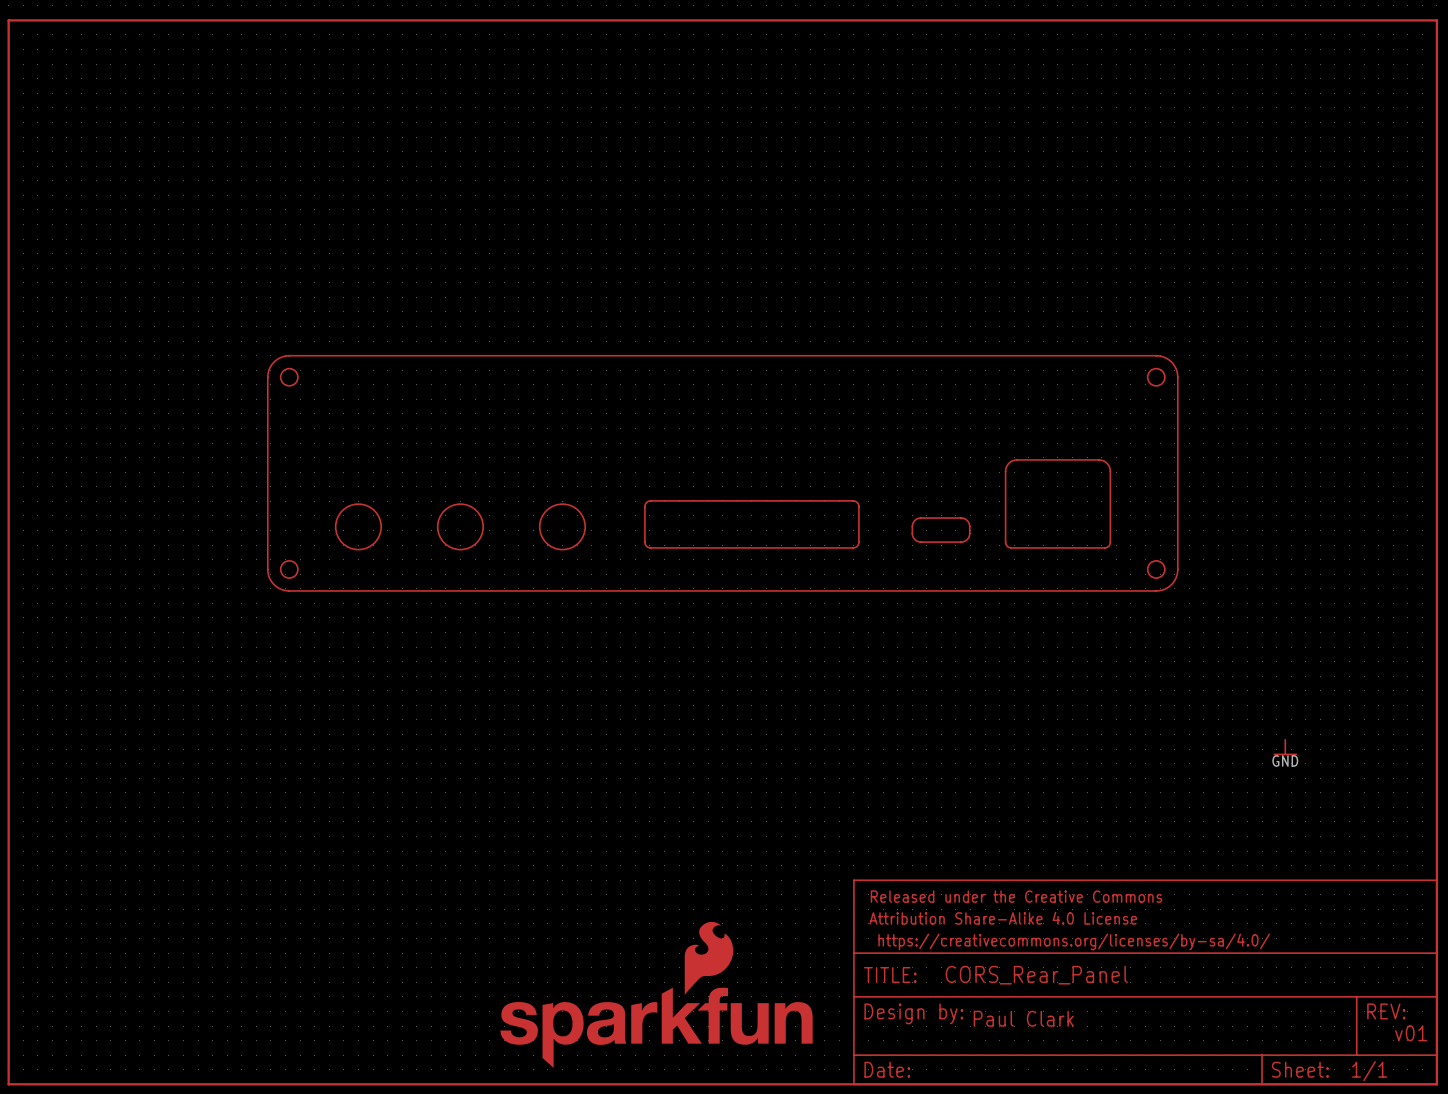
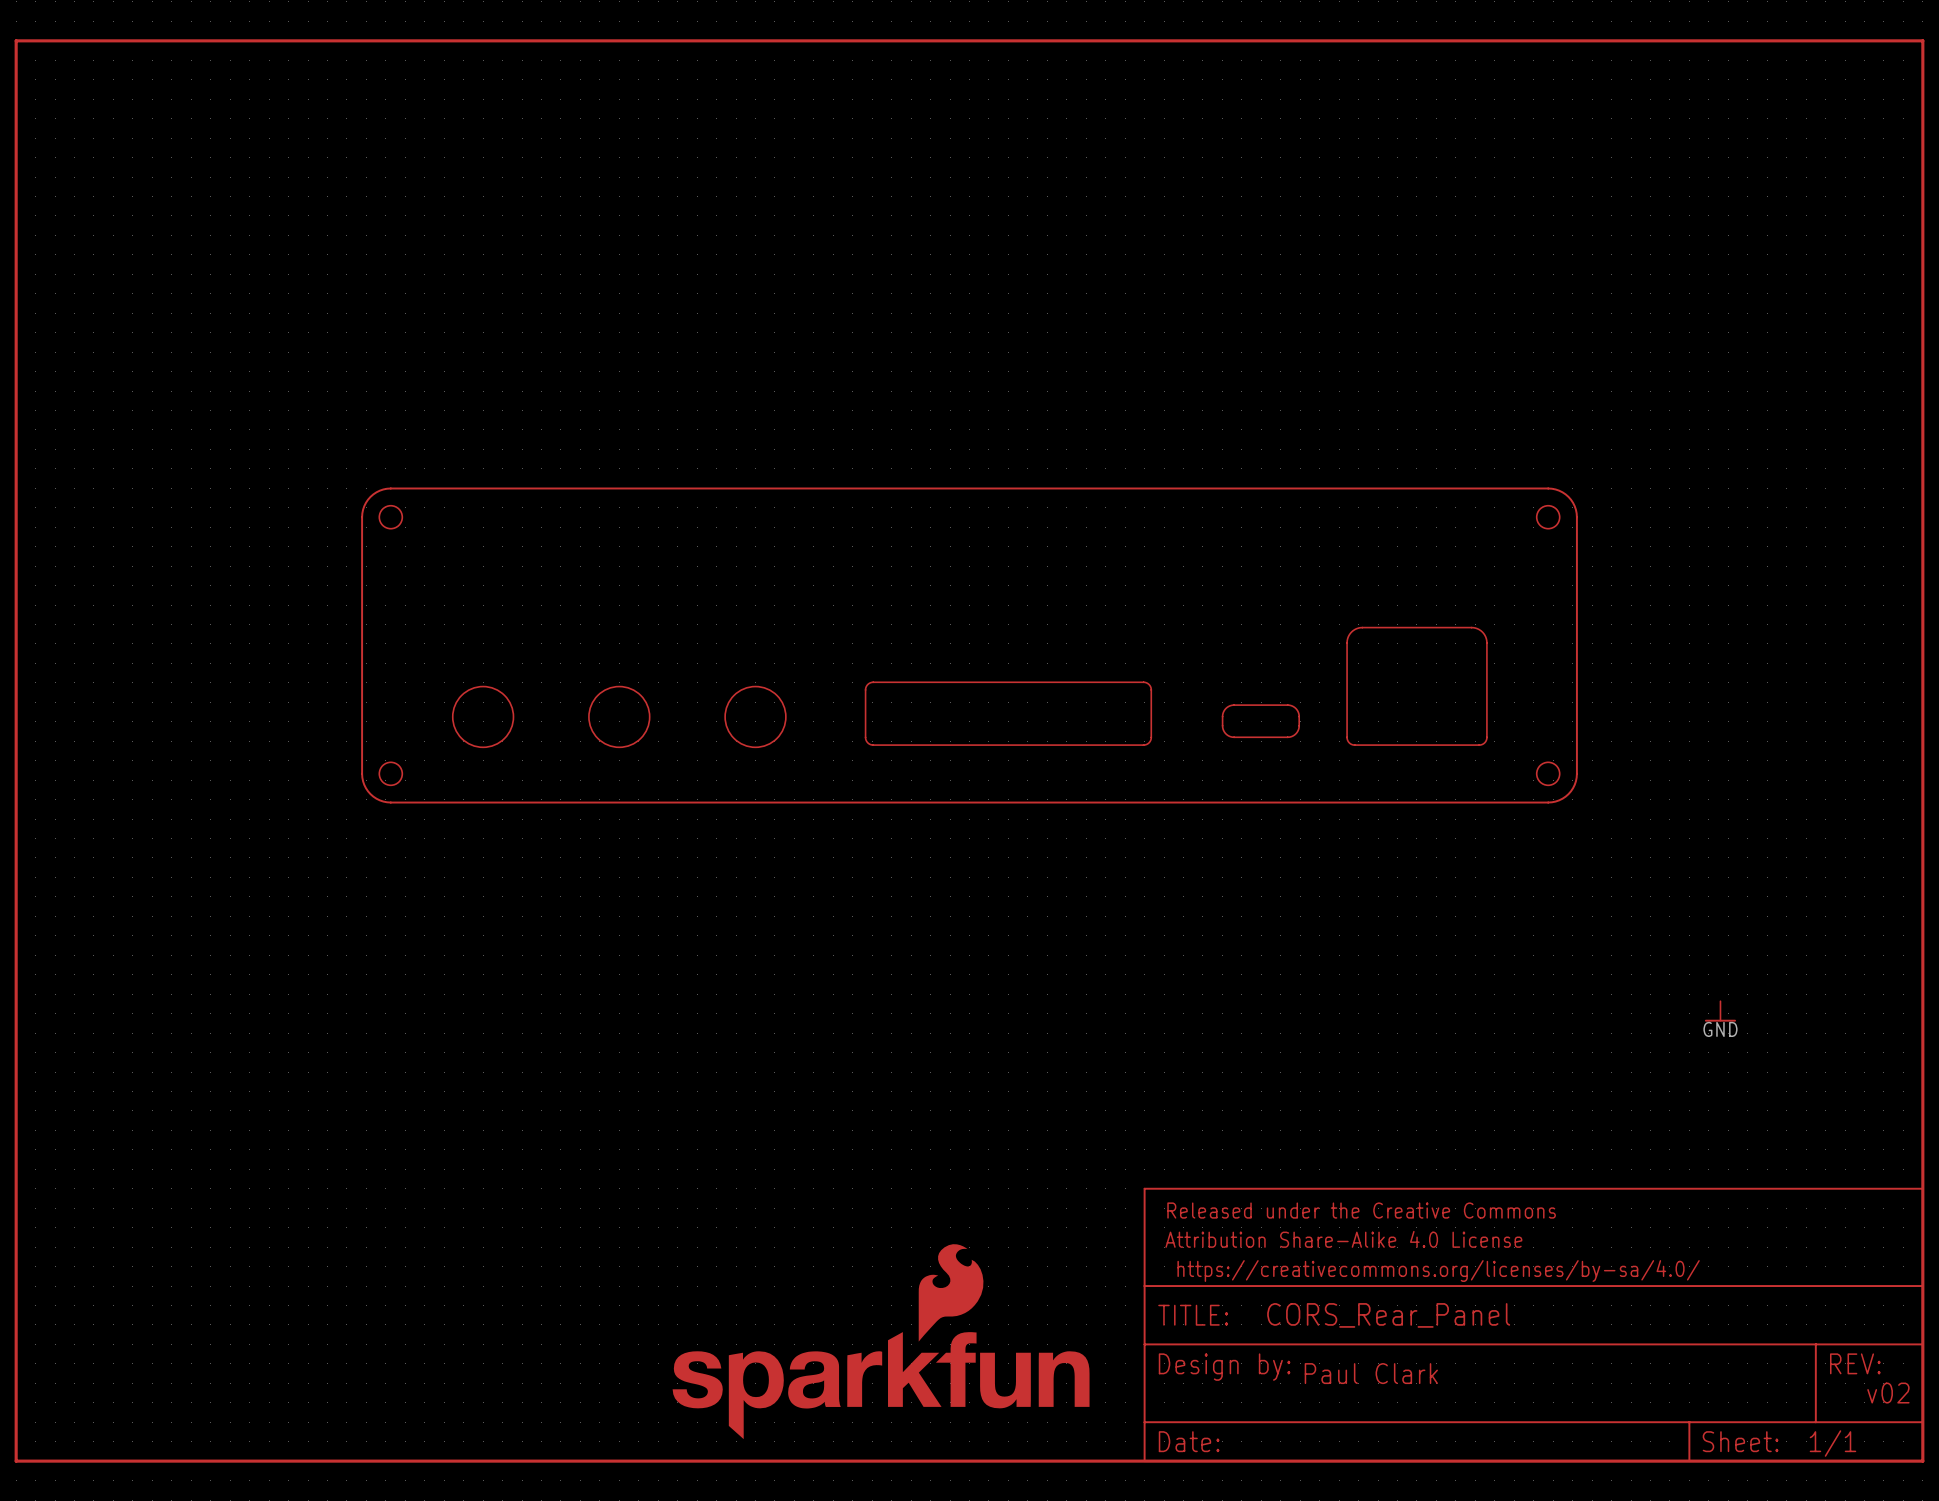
text: v01 (1411, 1033) -> v02 (1888, 1393)

